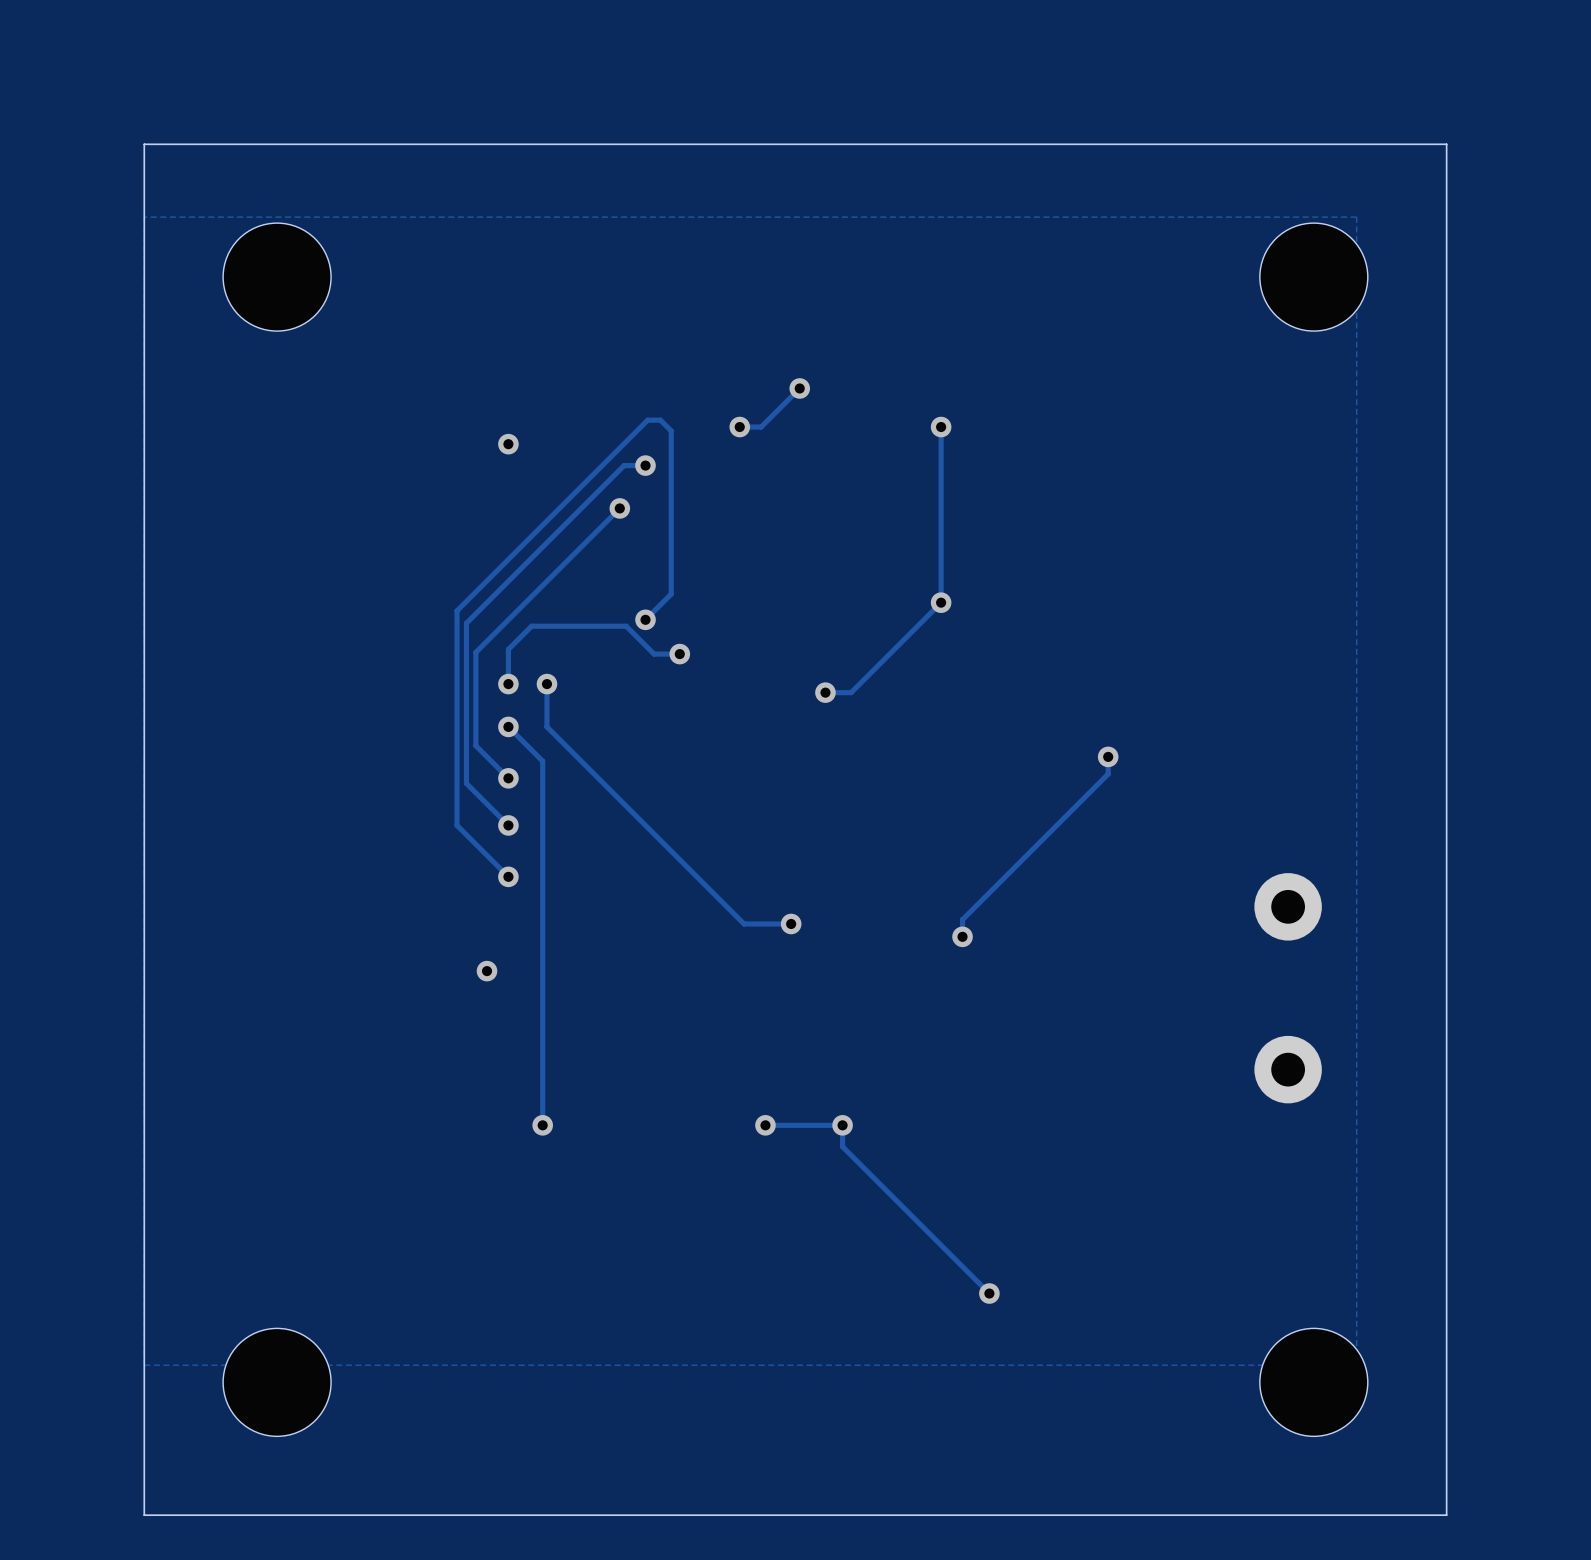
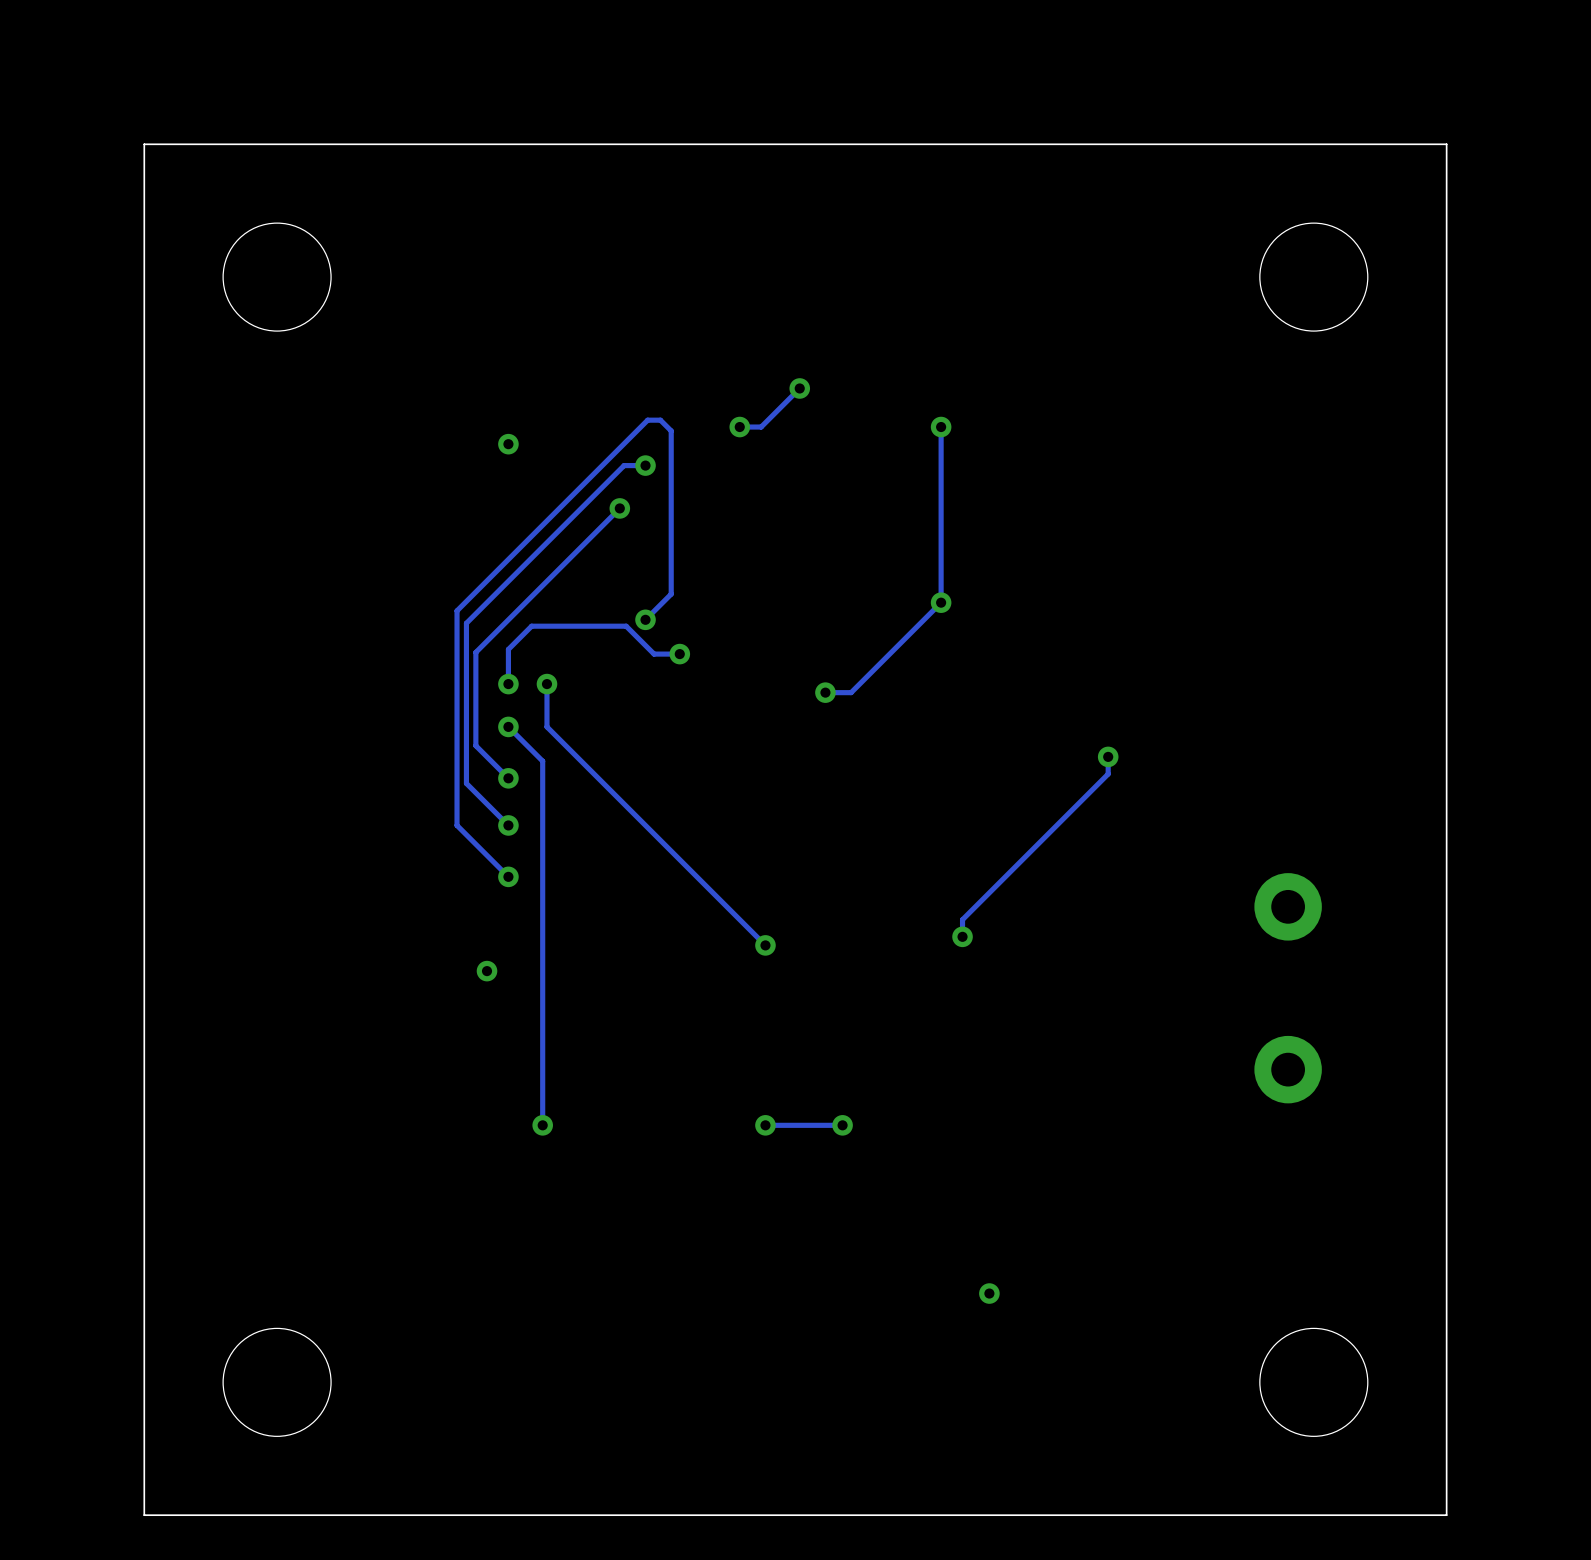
zone outline: (1356, 217) (144, 217) (144, 1365) (1356, 1365) (1356, 217) -> none
track: (791, 923) (744, 923) -> (765, 945) (744, 923)
via position: (791, 923) -> (765, 945)
track: (842, 1125) (842, 1146) (989, 1293) -> none

